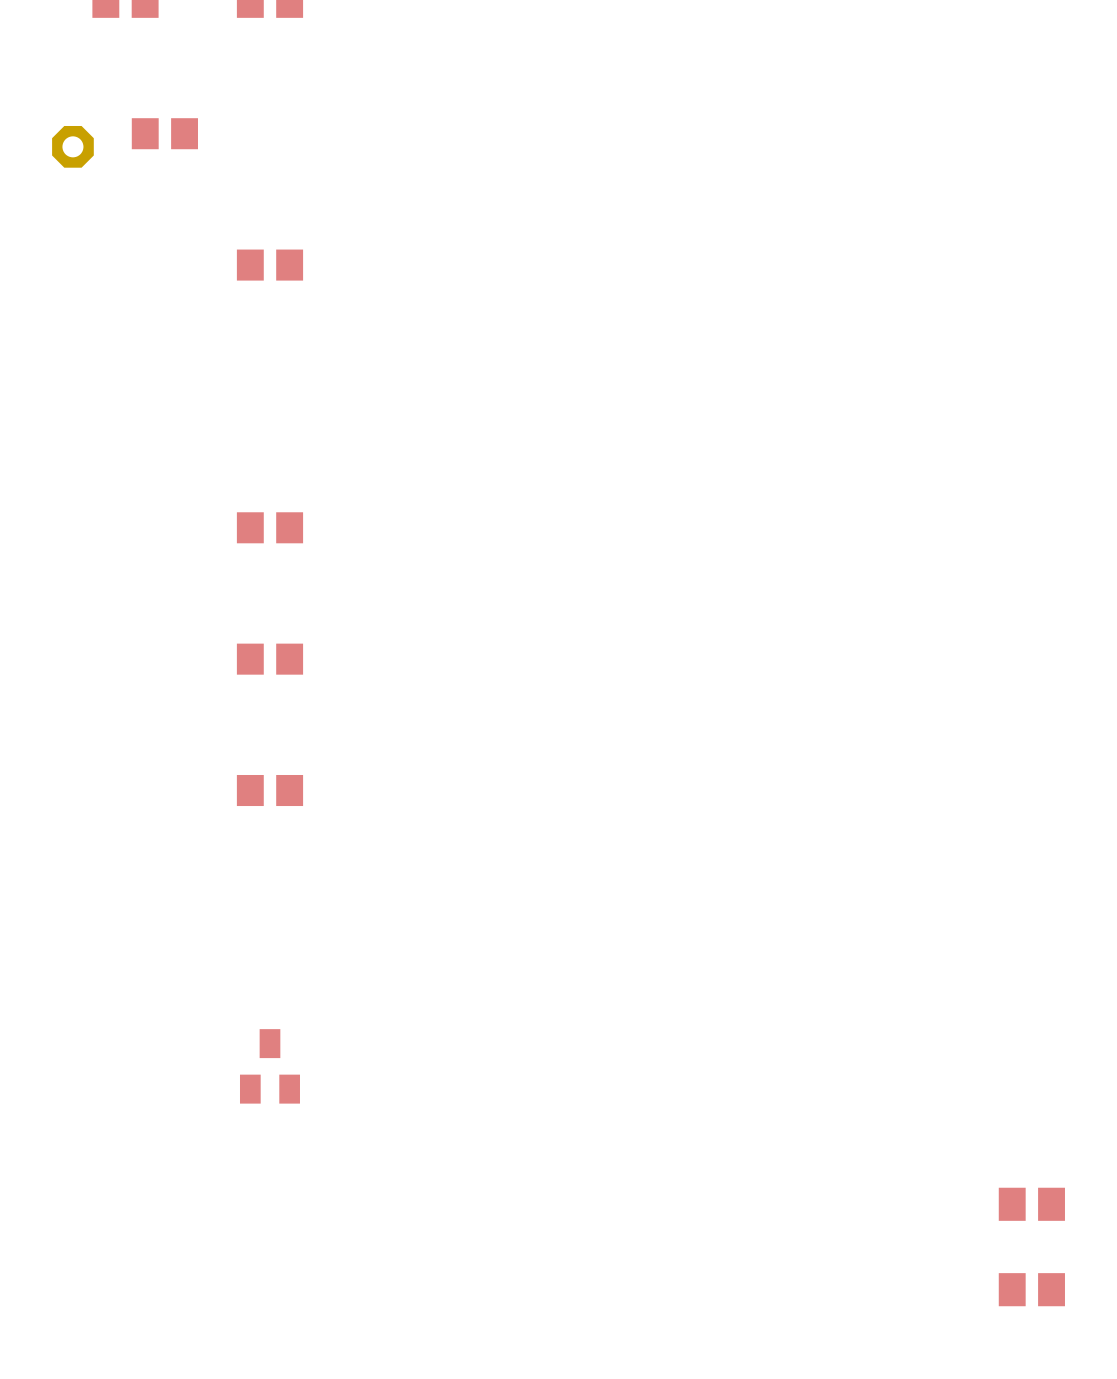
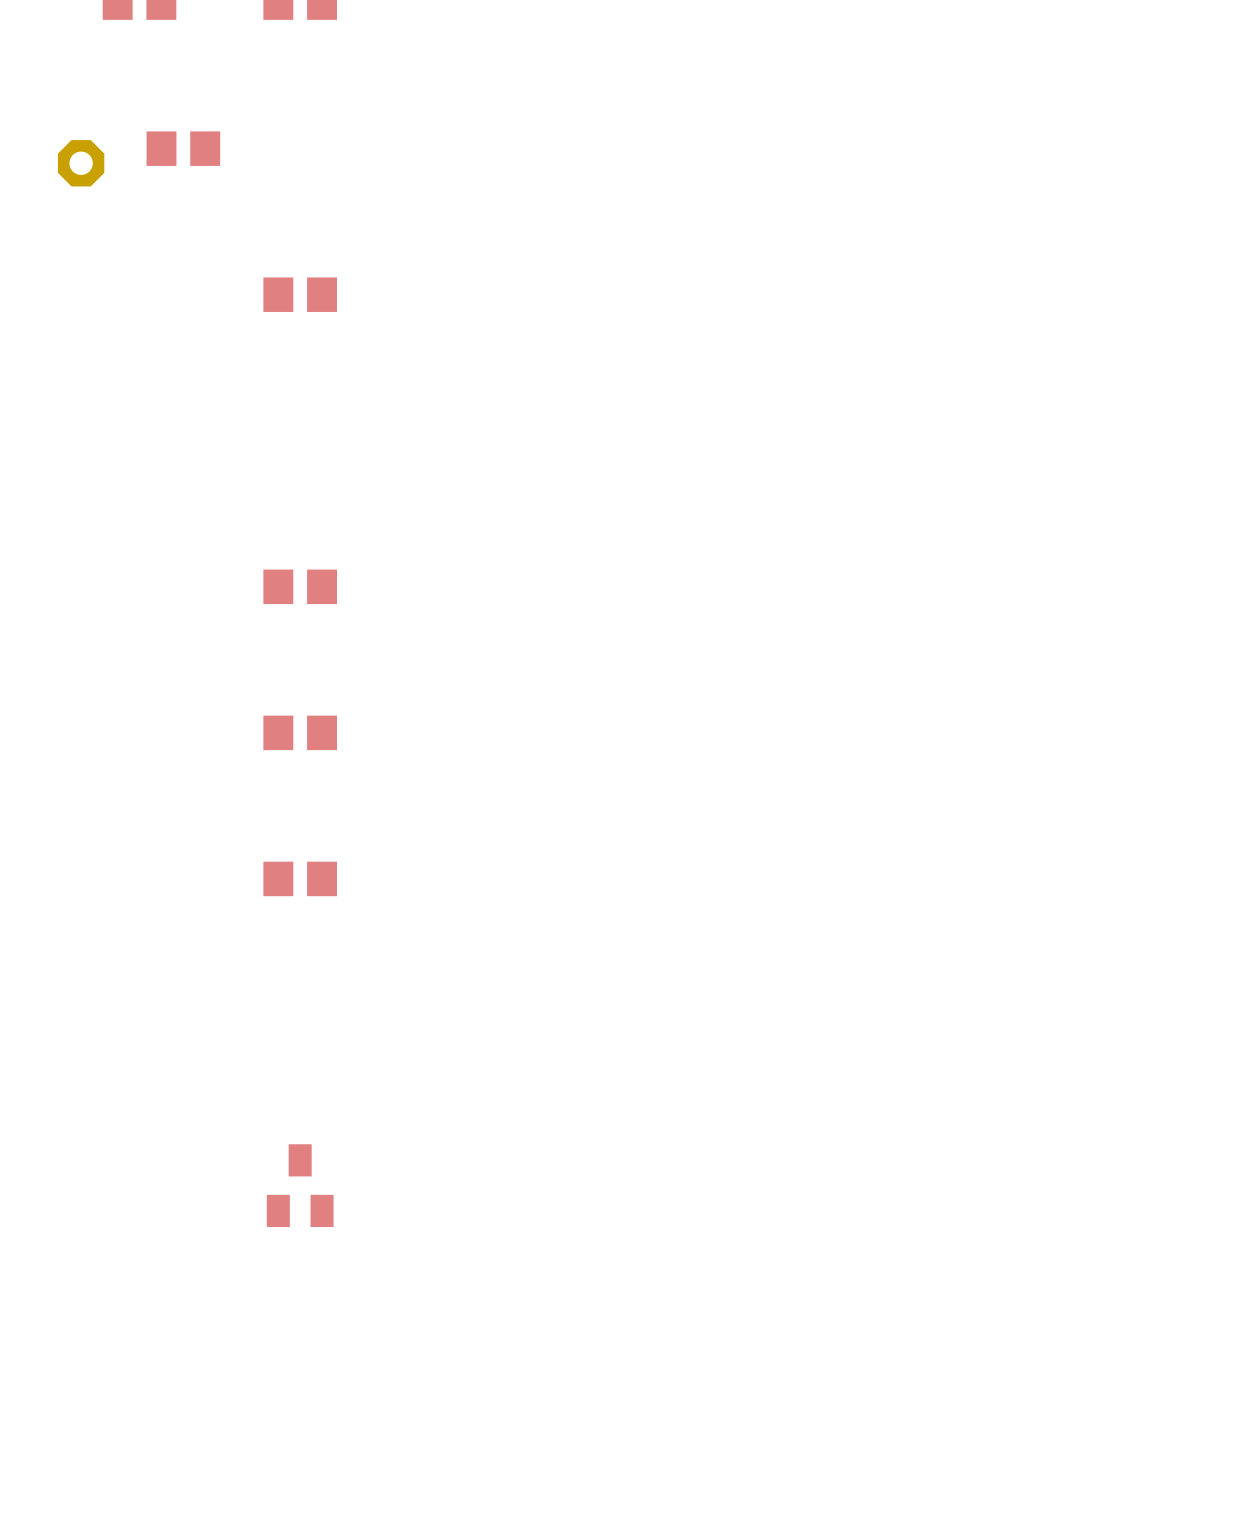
part: (1031, 1204) -> none
part: (1031, 1289) -> none

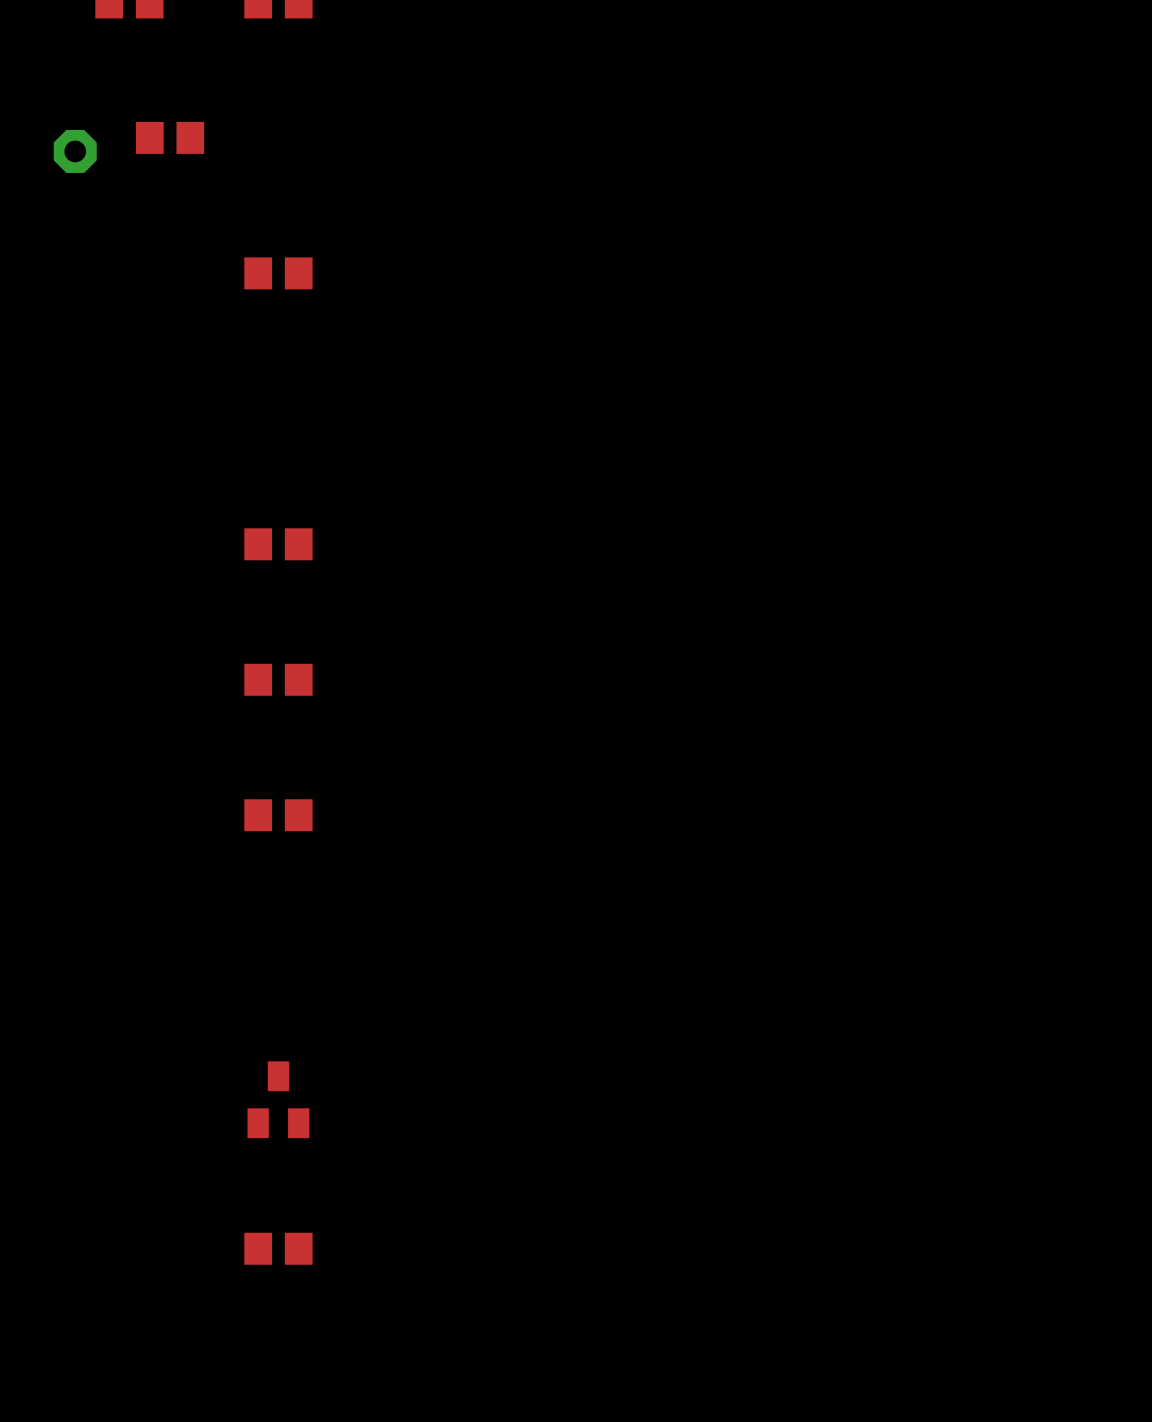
part: none -> (278, 1248)

